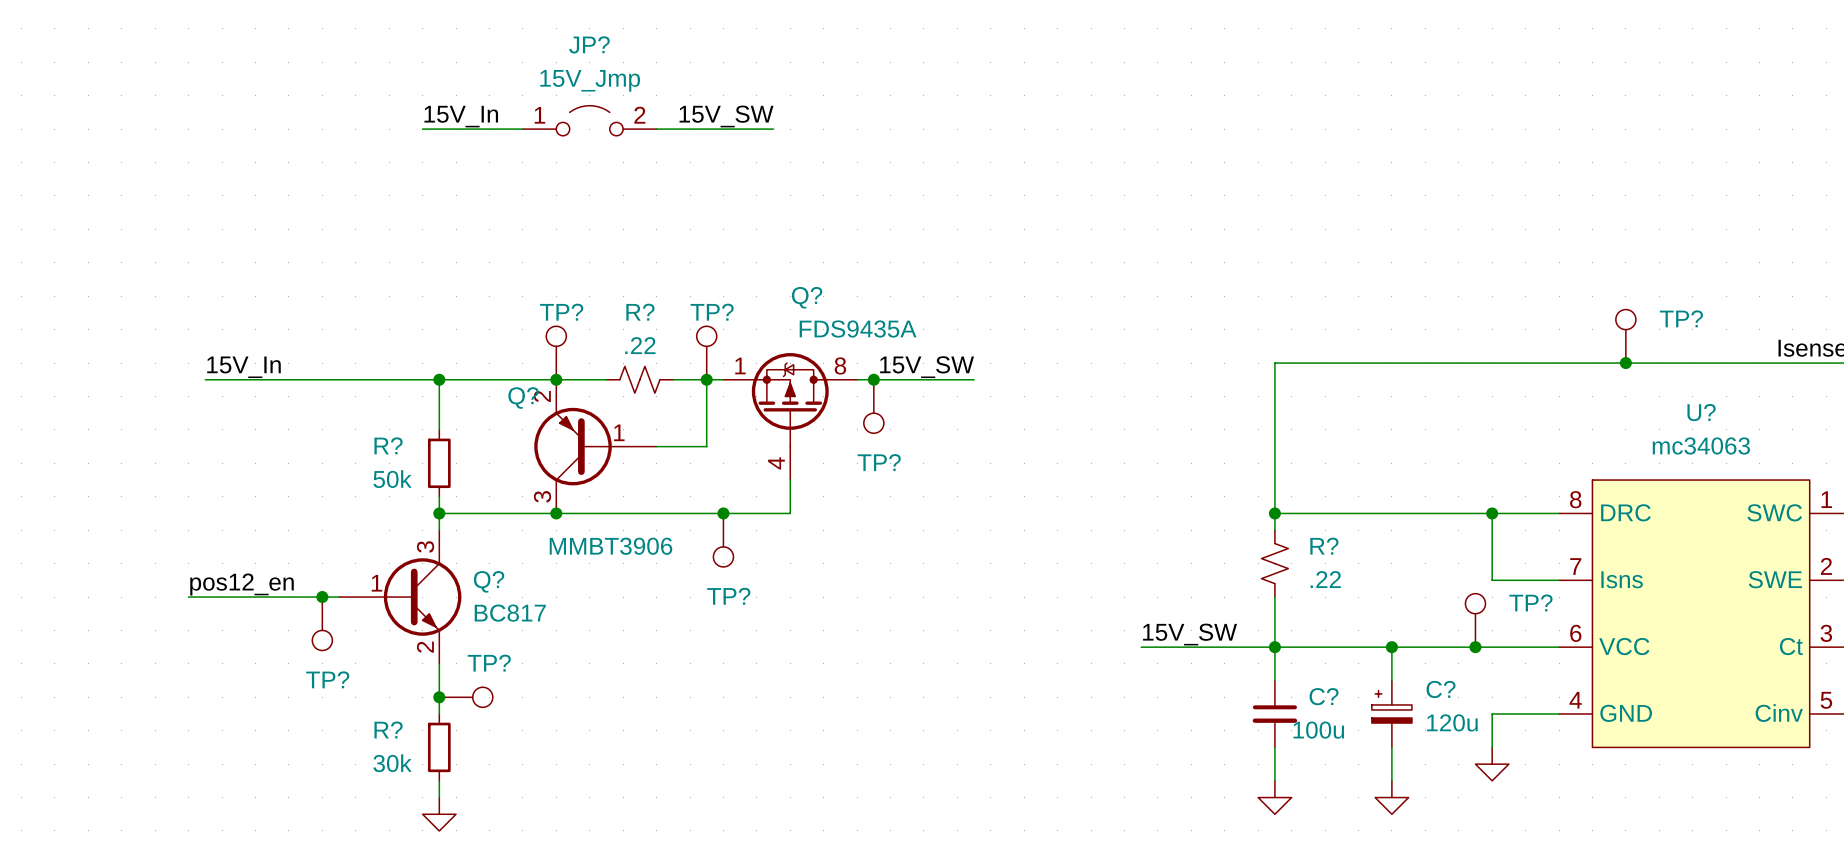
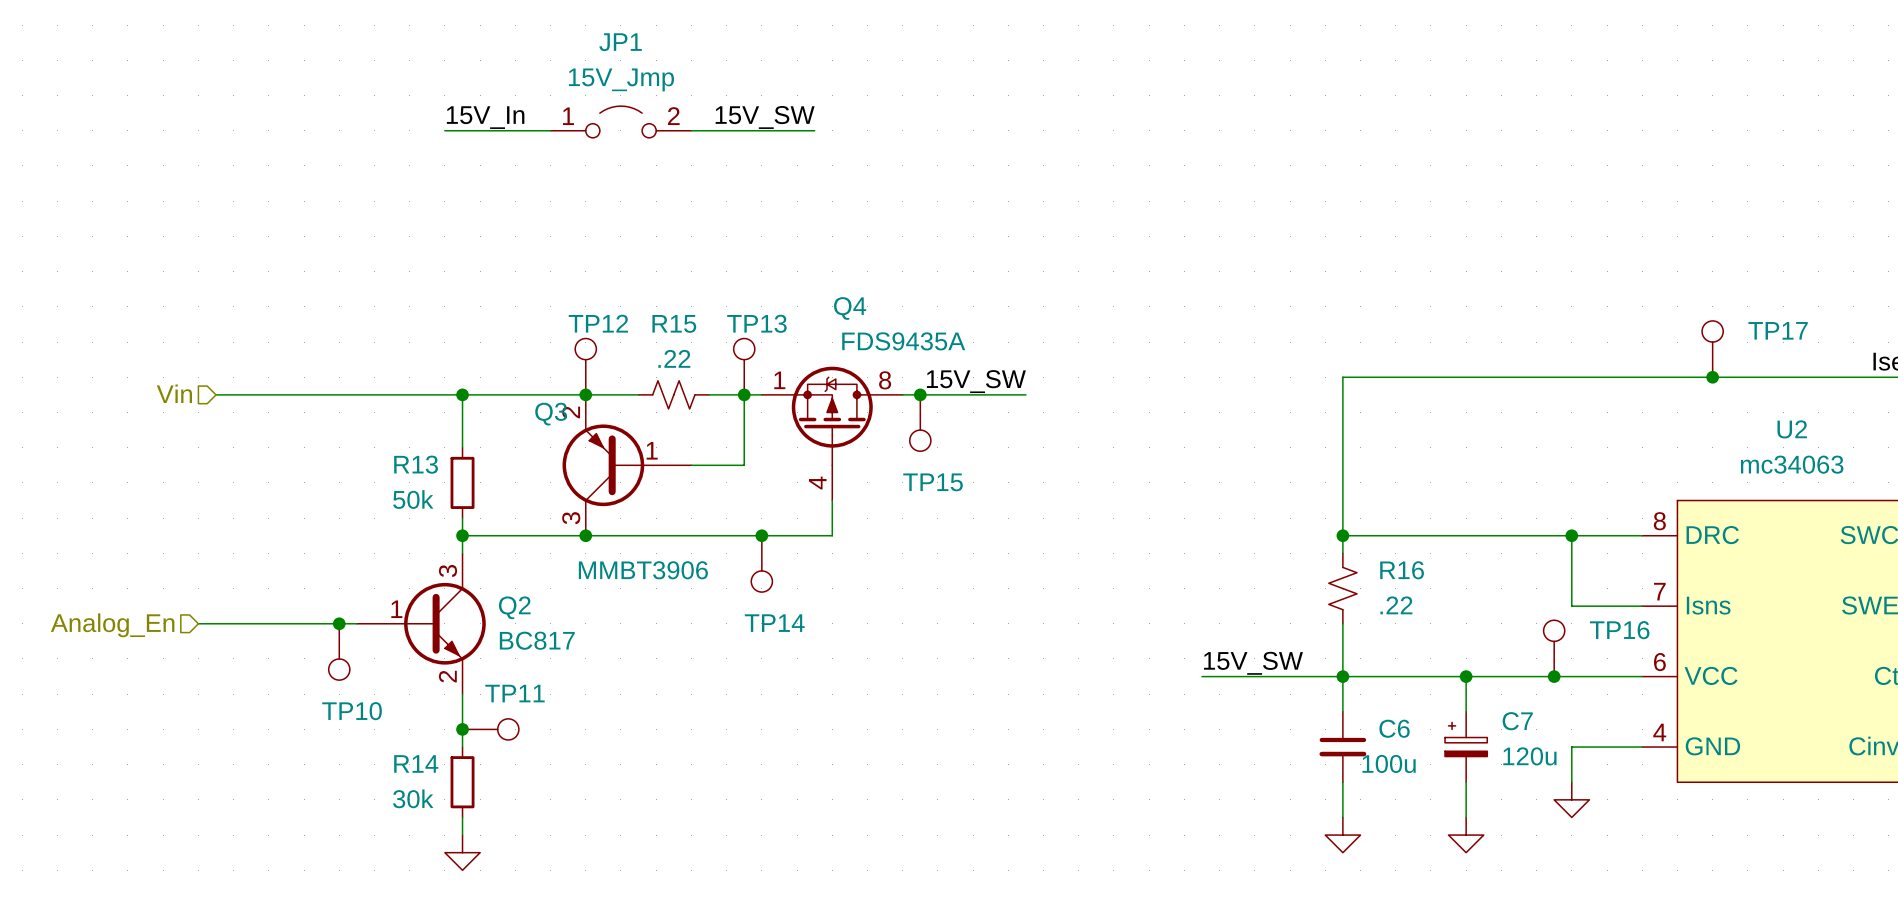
JP? name: JP? (589, 44) -> JP1 (620, 42)
Q? name: Q? (807, 297) -> Q4 (850, 308)
TP? name: TP? (561, 312) -> TP12 (598, 323)
R? name: R? (640, 312) -> R15 (674, 323)
TP? name: TP? (712, 312) -> TP13 (756, 323)
TP? name: TP? (1681, 318) -> TP17 (1778, 330)
label: 15V_In (243, 367) -> none
hierarchical label: none -> Vin (174, 393)
Q? name: Q? (523, 398) -> Q3 (551, 414)
U? name: U? (1701, 412) -> U2 (1792, 429)
R? name: R? (388, 445) -> R13 (416, 464)
TP? name: TP? (879, 462) -> TP15 (933, 482)
R? name: R? (1324, 546) -> R16 (1402, 570)
Q? name: Q? (489, 581) -> Q2 (514, 607)
label: pos12_en (241, 584) -> none
TP? name: TP? (728, 596) -> TP14 (774, 623)
hierarchical label: none -> Analog_En (112, 625)
TP? name: TP? (1530, 602) -> TP16 (1619, 630)
TP? name: TP? (489, 663) -> TP11 (515, 693)
TP? name: TP? (327, 679) -> TP10 (352, 711)
C? name: C? (1441, 689) -> C7 (1517, 721)
C? name: C? (1324, 696) -> C6 (1394, 728)
R? name: R? (388, 729) -> R14 (416, 763)

